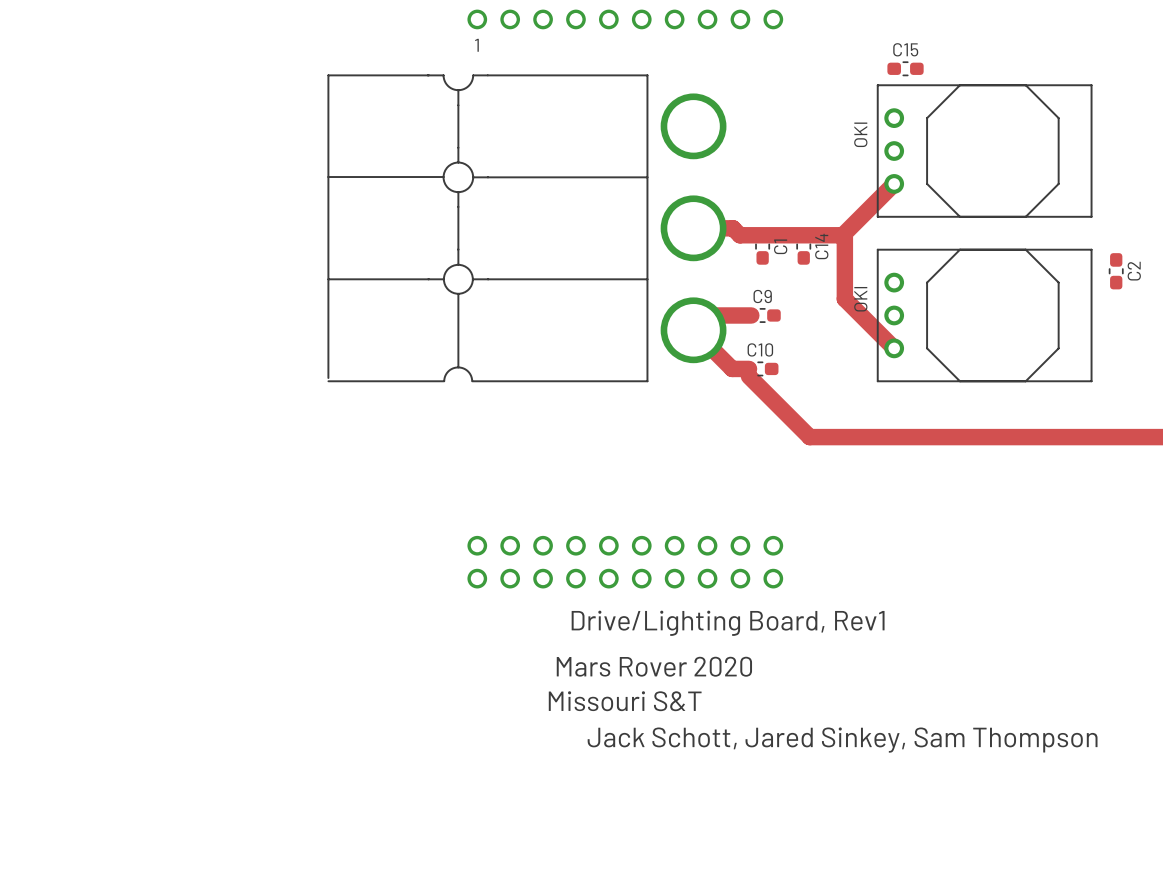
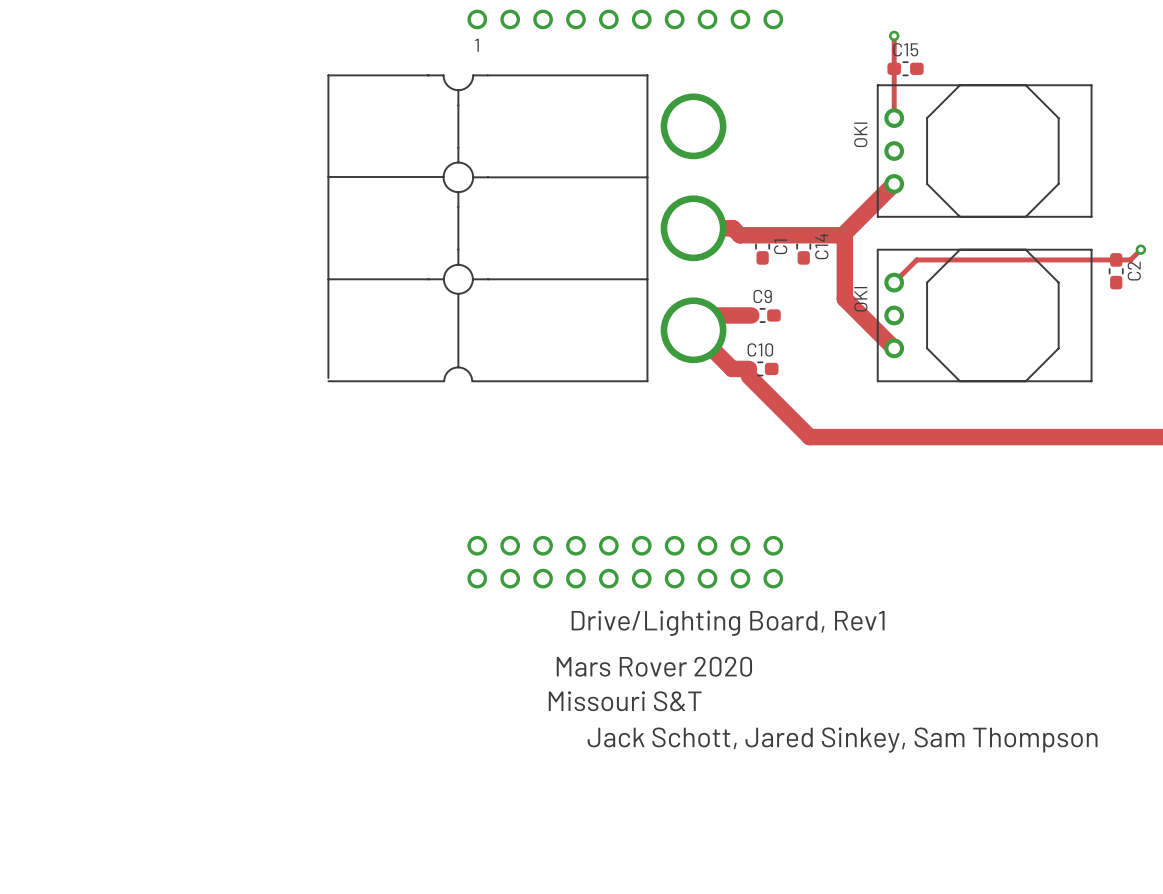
track: none -> (894, 35) (894, 118)
via: none -> (894, 35)
track: none -> (1140, 249) (1130, 259) (916, 259) (894, 282)
via: none -> (1140, 249)

